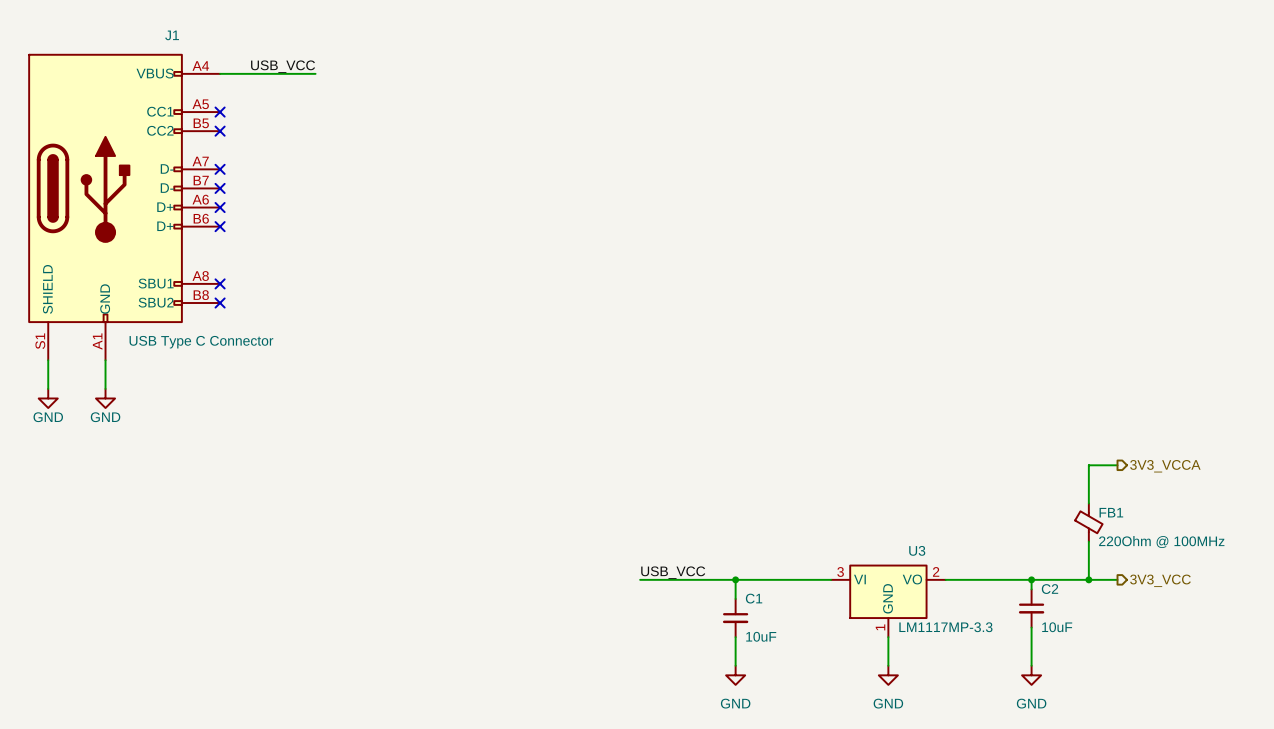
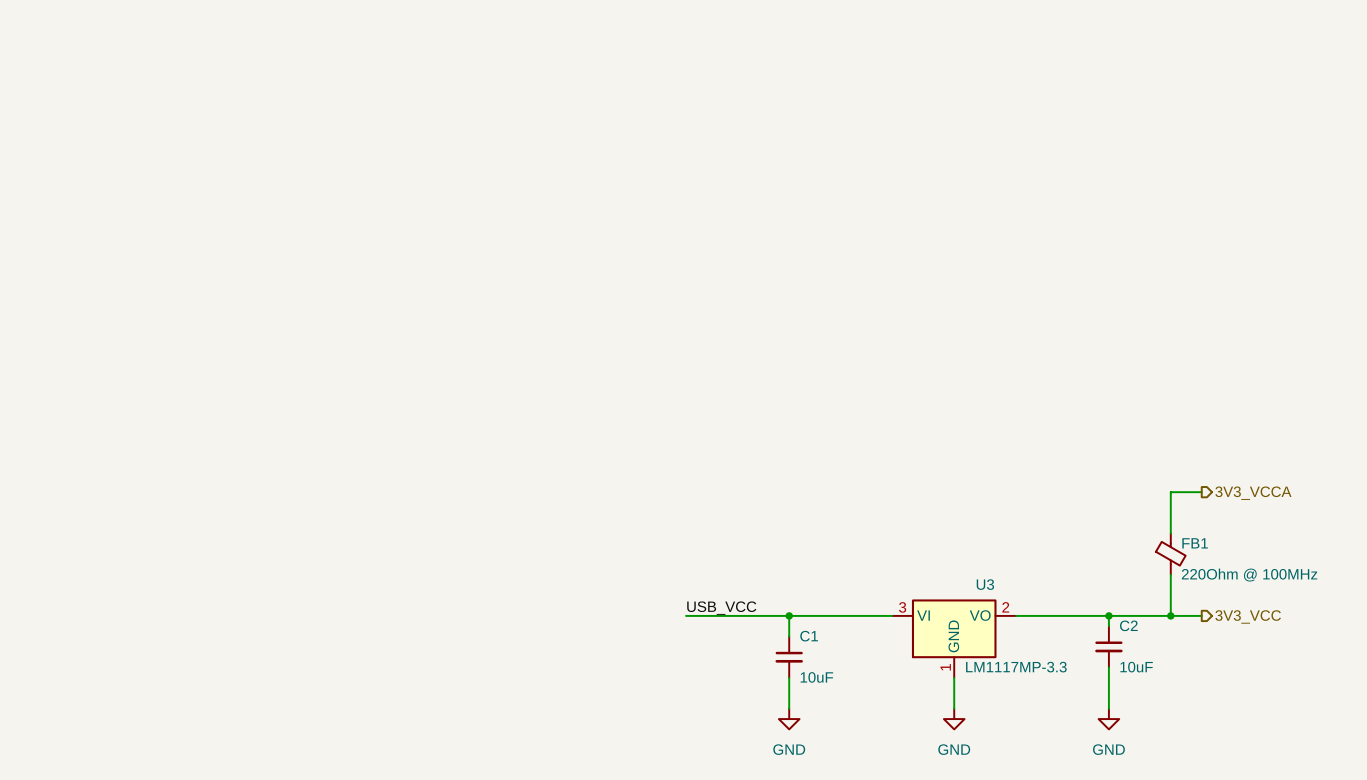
label: USB_VCC (283, 66) -> none
wire: (220, 73) (315, 73) -> none
no-connect mark: (220, 112) -> none
no-connect mark: (220, 131) -> none
no-connect mark: (220, 169) -> none
no-connect mark: (220, 188) -> none
J1: USB Type C Connector (124, 207) -> none
no-connect mark: (220, 207) -> none
no-connect mark: (220, 226) -> none
no-connect mark: (220, 283) -> none
no-connect mark: (220, 303) -> none
wire: (48, 360) (48, 388) -> none
wire: (105, 360) (105, 388) -> none
power symbol: GND (48, 398) -> none
power symbol: GND (105, 398) -> none

